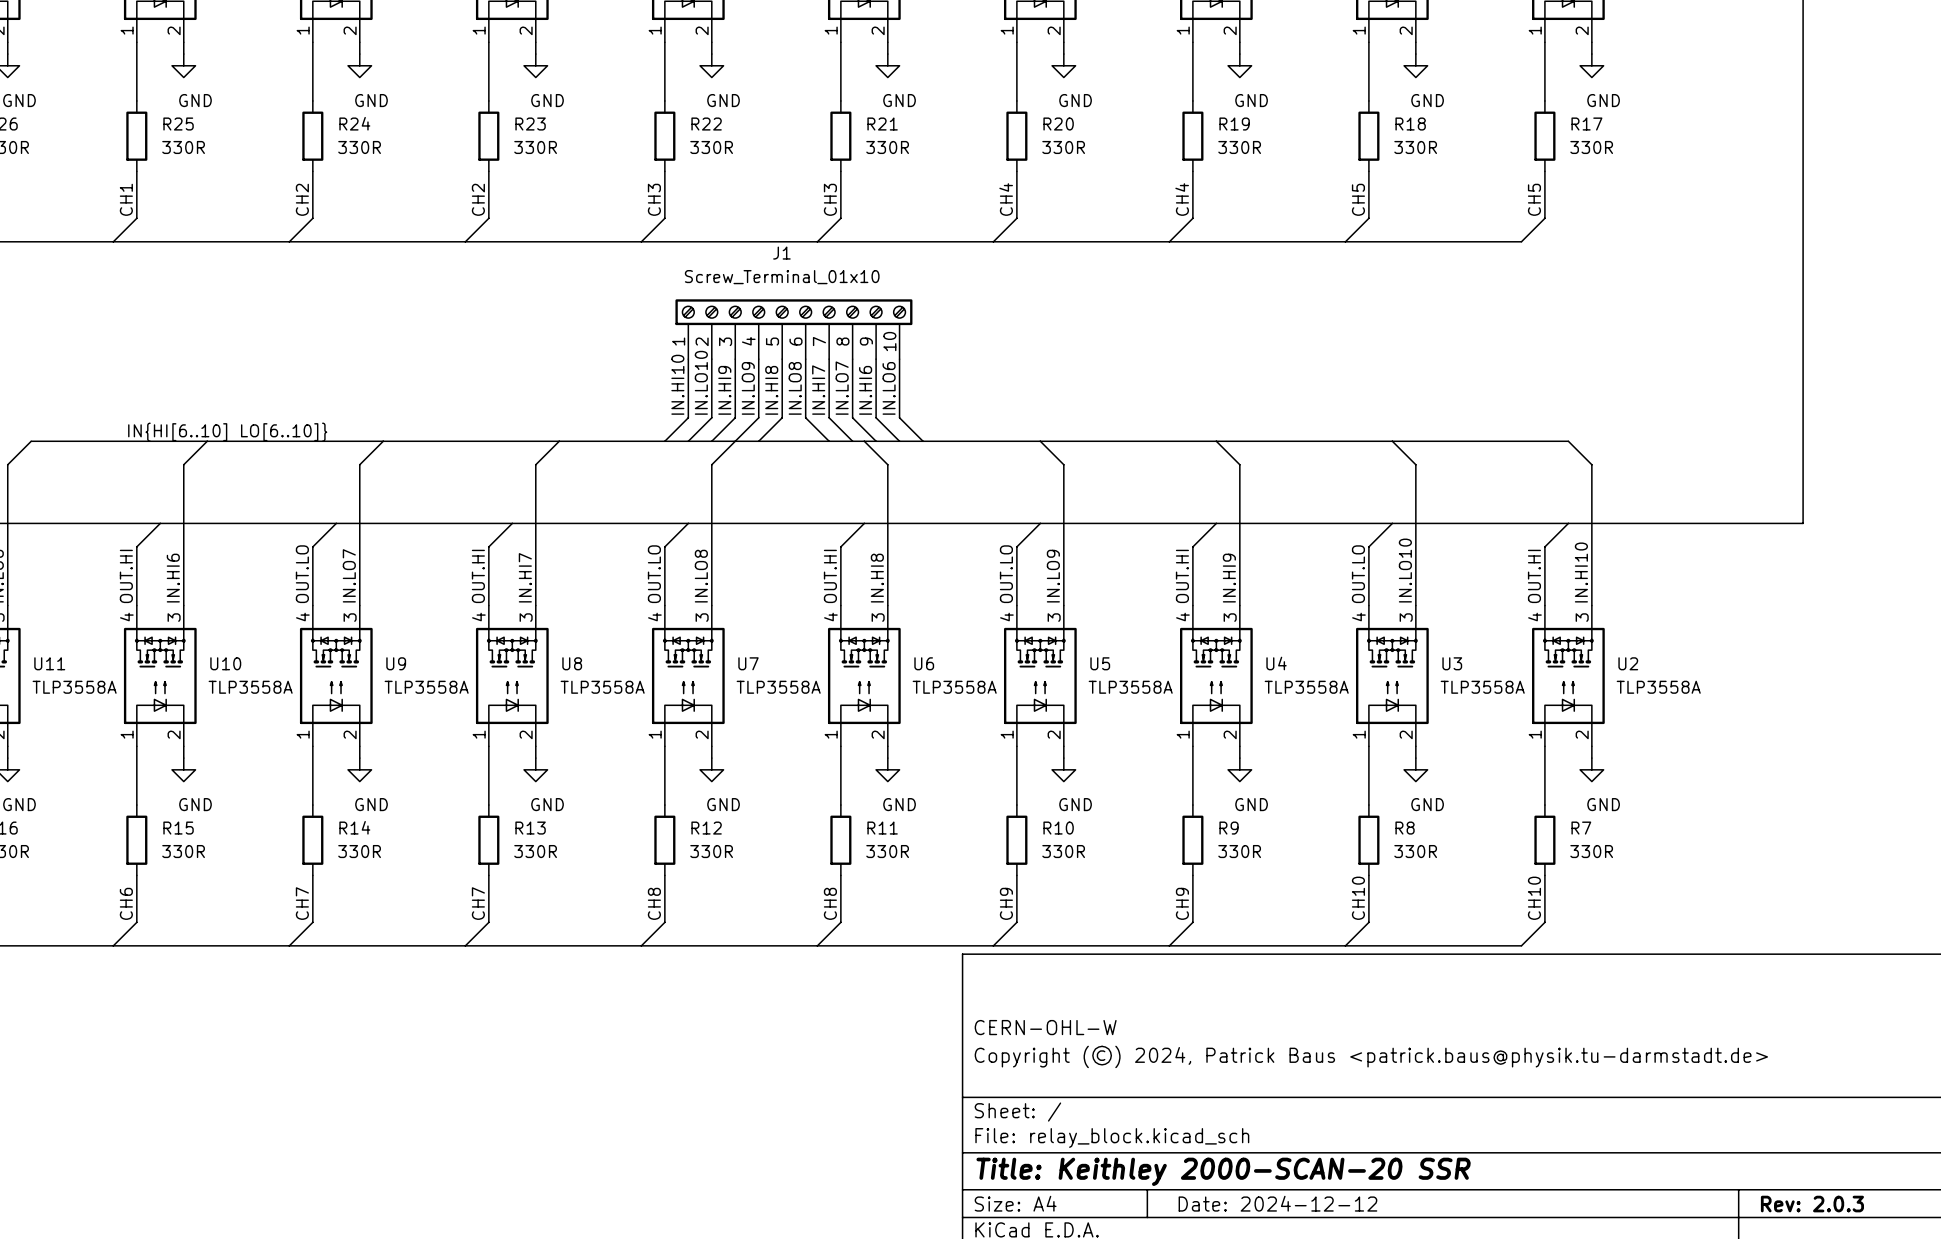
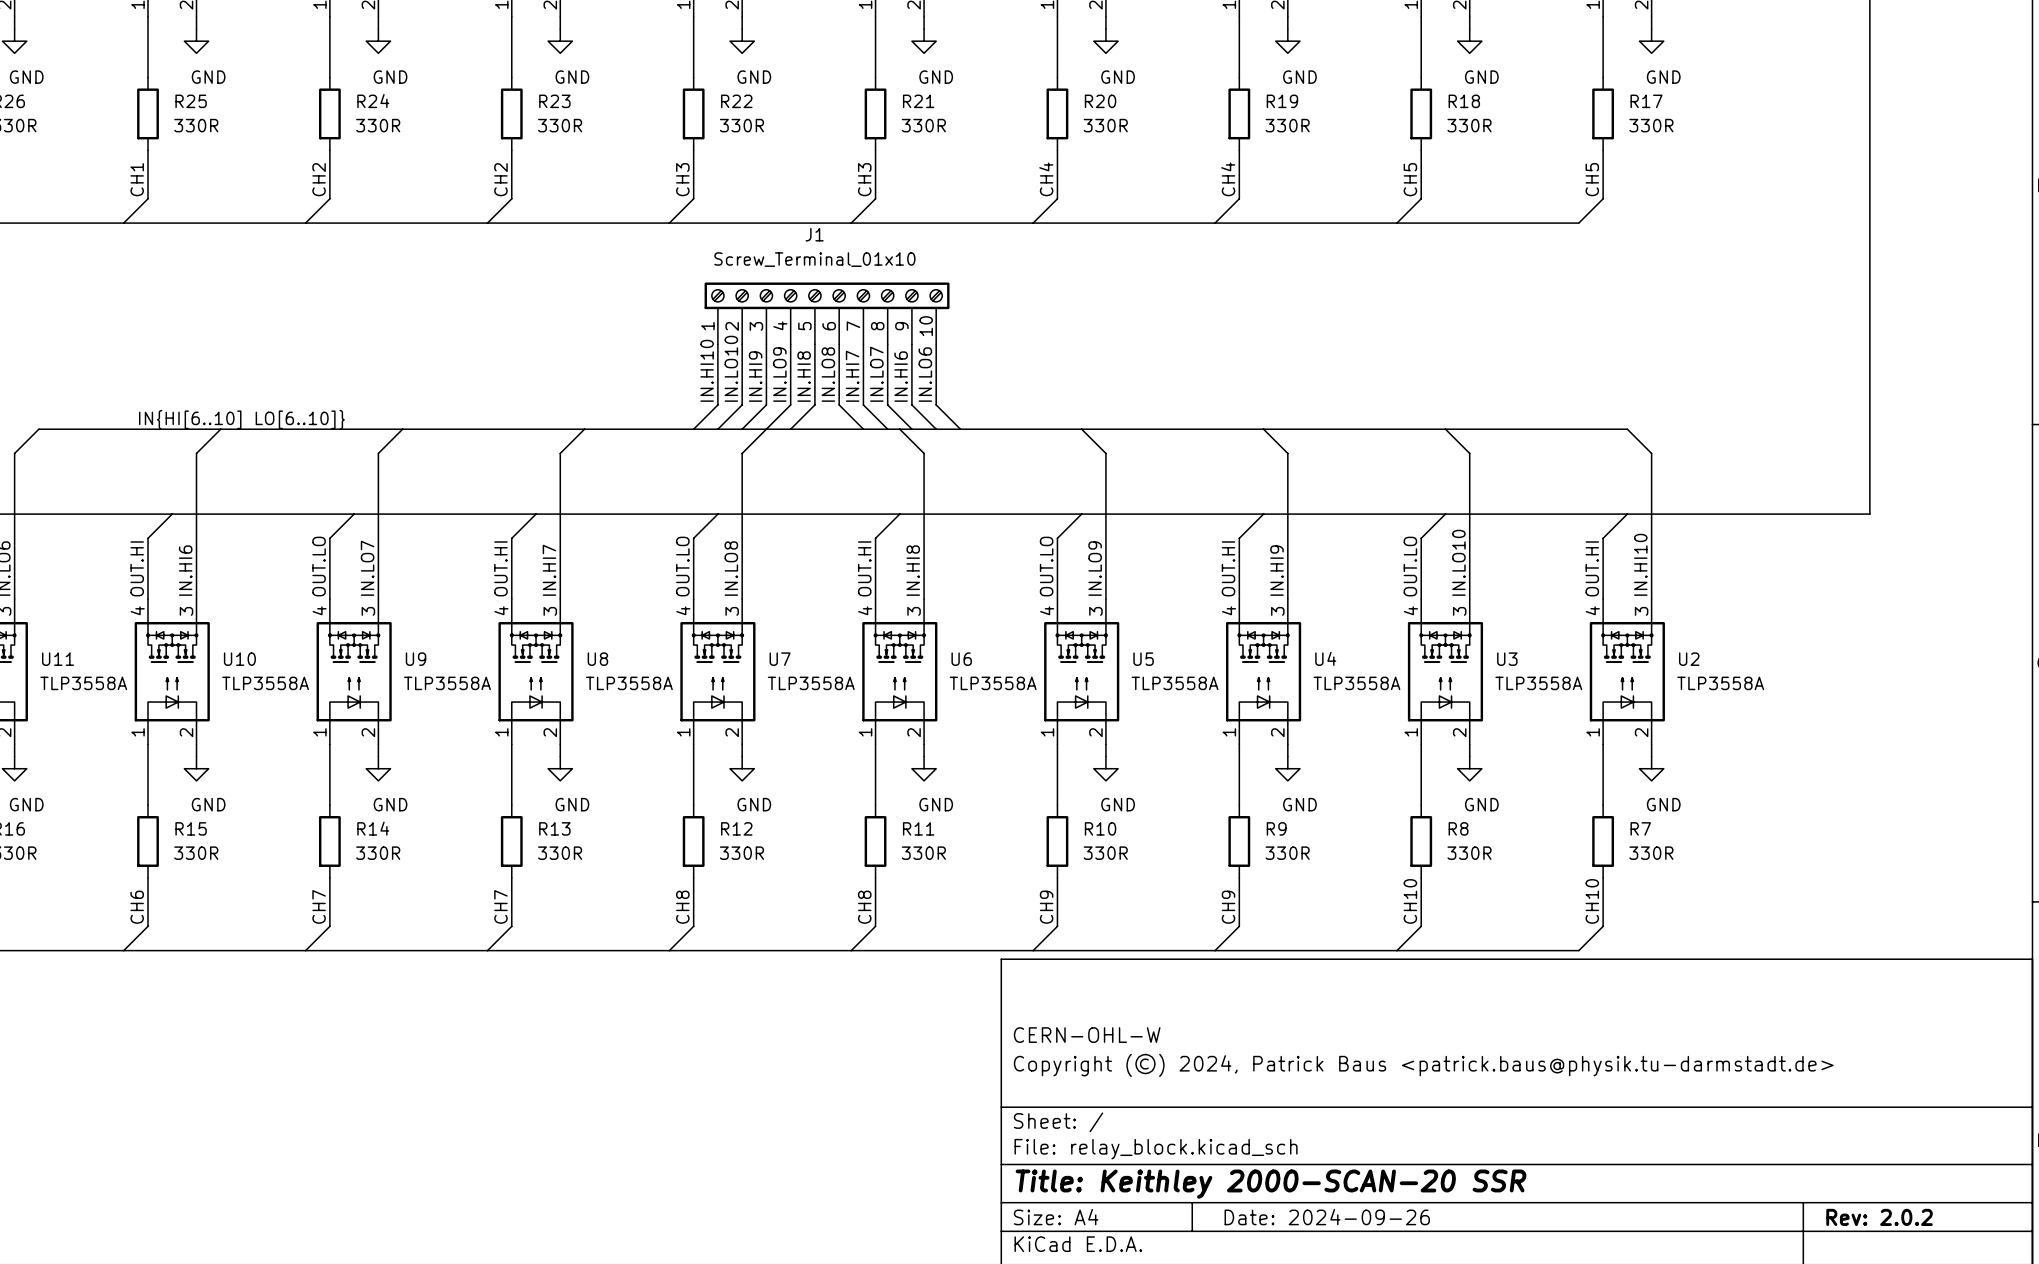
title block: Date: 2024-12-12 (1277, 1203) -> Date: 2024-09-26 (1327, 1217)
title block: Rev: 2.0.3 (1812, 1204) -> Rev: 2.0.2 (1879, 1217)

